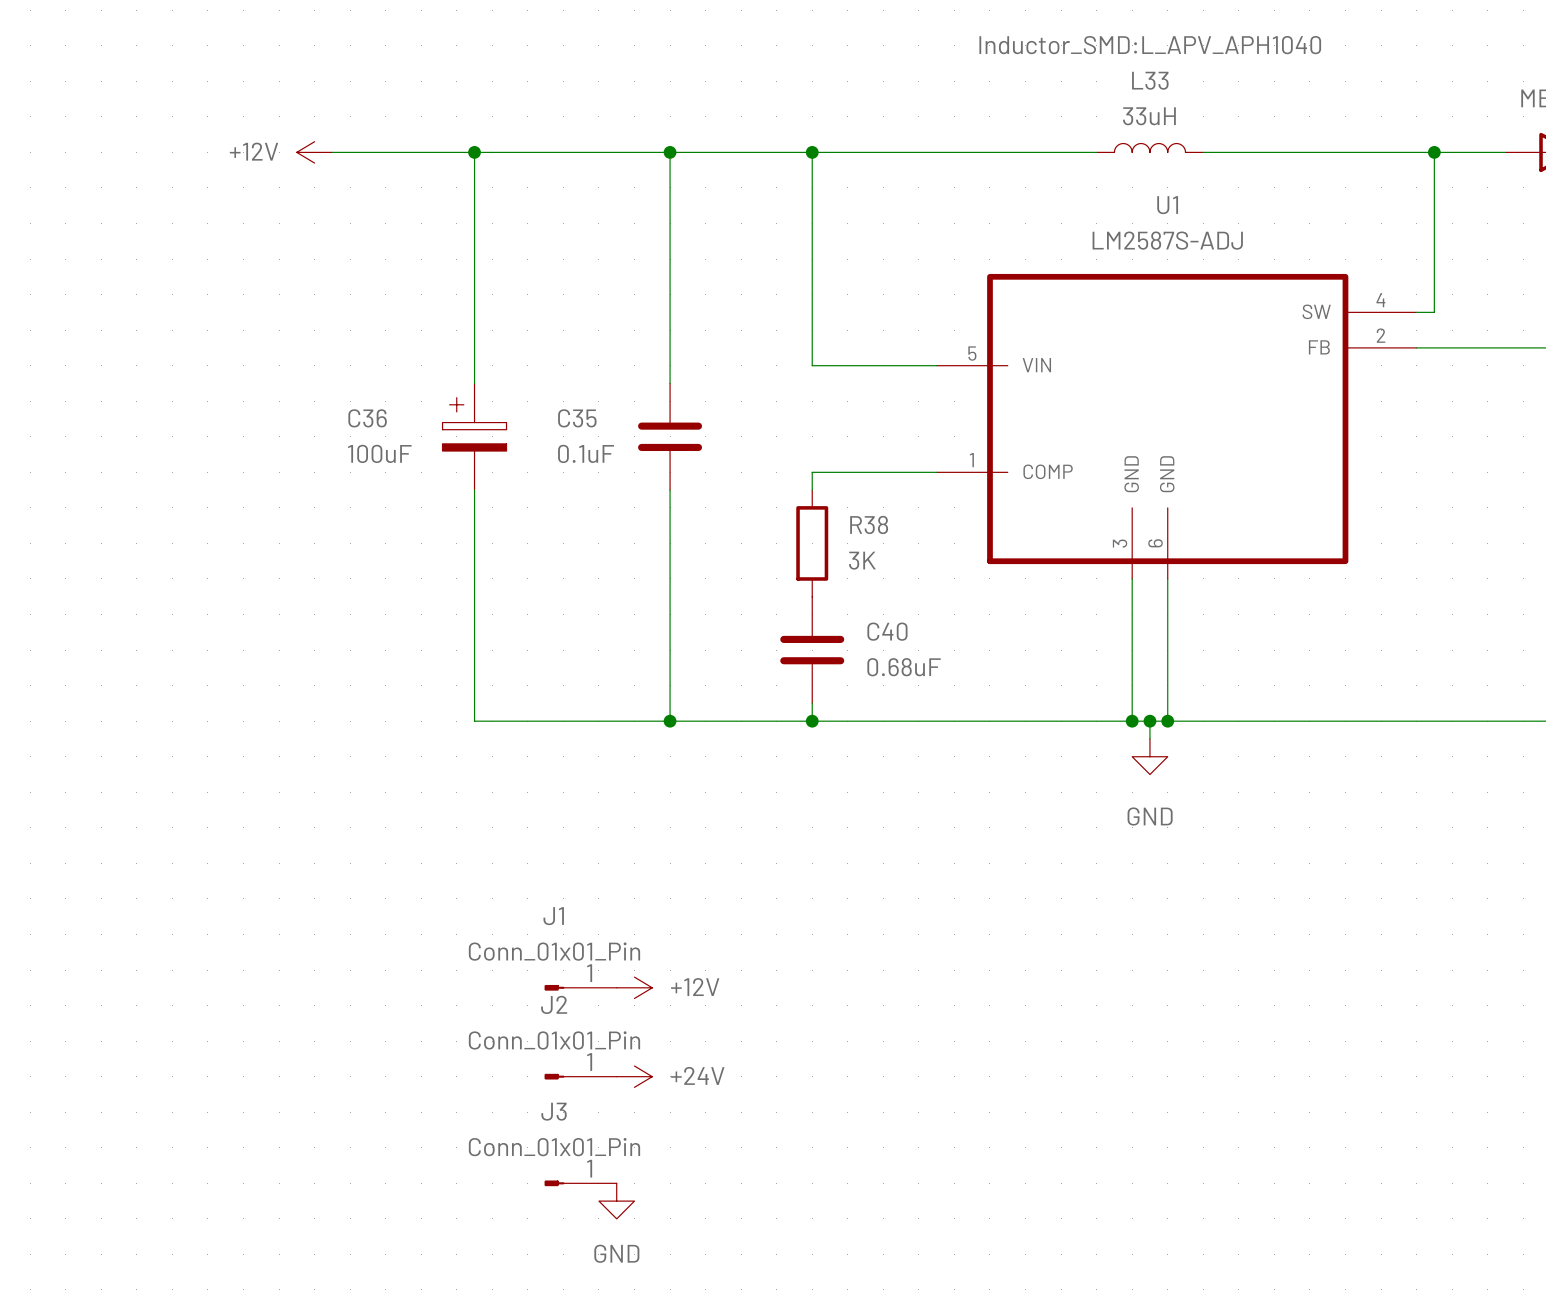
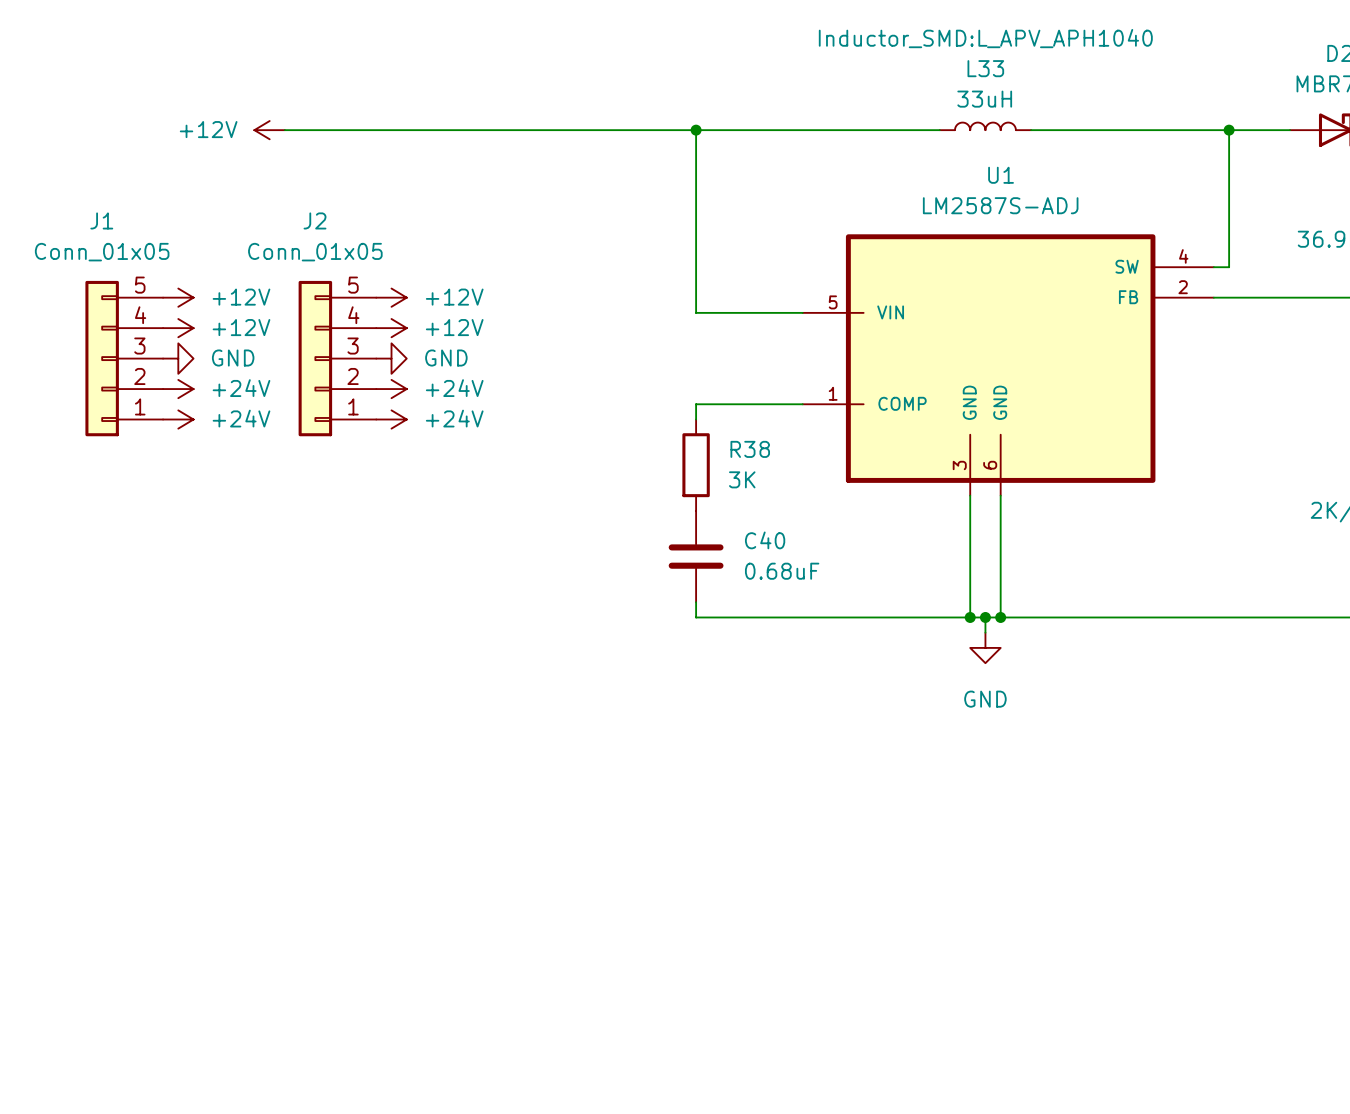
wire: (474, 152) (474, 383) -> none
junction: (474, 152) -> none
wire: (670, 152) (670, 383) -> none
junction: (670, 152) -> none
power symbol: none -> +12V (178, 297)
power symbol: none -> +12V (391, 297)
power symbol: none -> +12V (178, 328)
power symbol: none -> +12V (391, 328)
power symbol: none -> GND (178, 358)
power symbol: none -> GND (391, 358)
C36: 100uF (474, 436) -> none
C35: 0.1uF (670, 436) -> none
power symbol: none -> +24V (178, 389)
power symbol: none -> +24V (391, 389)
power symbol: none -> +24V (178, 419)
power symbol: none -> +24V (391, 419)
wire: (474, 490) (474, 721) (812, 721) -> none
wire: (670, 490) (670, 721) -> none
junction: (670, 721) -> none
junction: (812, 721) -> none
J1 name position: J1 (553, 916) -> J1 (101, 220)
J1 value: Conn_01x01_Pin (554, 951) -> Conn_01x05 (102, 252)
J1 symbol: [544, 984, 617, 991] -> [85, 280, 164, 437]
power symbol: +12V (634, 987) -> none
J2 name position: J2 (554, 1004) -> J2 (315, 220)
J2 value: Conn_01x01_Pin (554, 1040) -> Conn_01x05 (315, 252)
J2 symbol: [544, 1073, 617, 1080] -> [298, 280, 377, 437]
power symbol: +24V (634, 1076) -> none
J3: Conn_01x01_Pin (580, 1183) -> none
power symbol: GND (616, 1201) -> none

